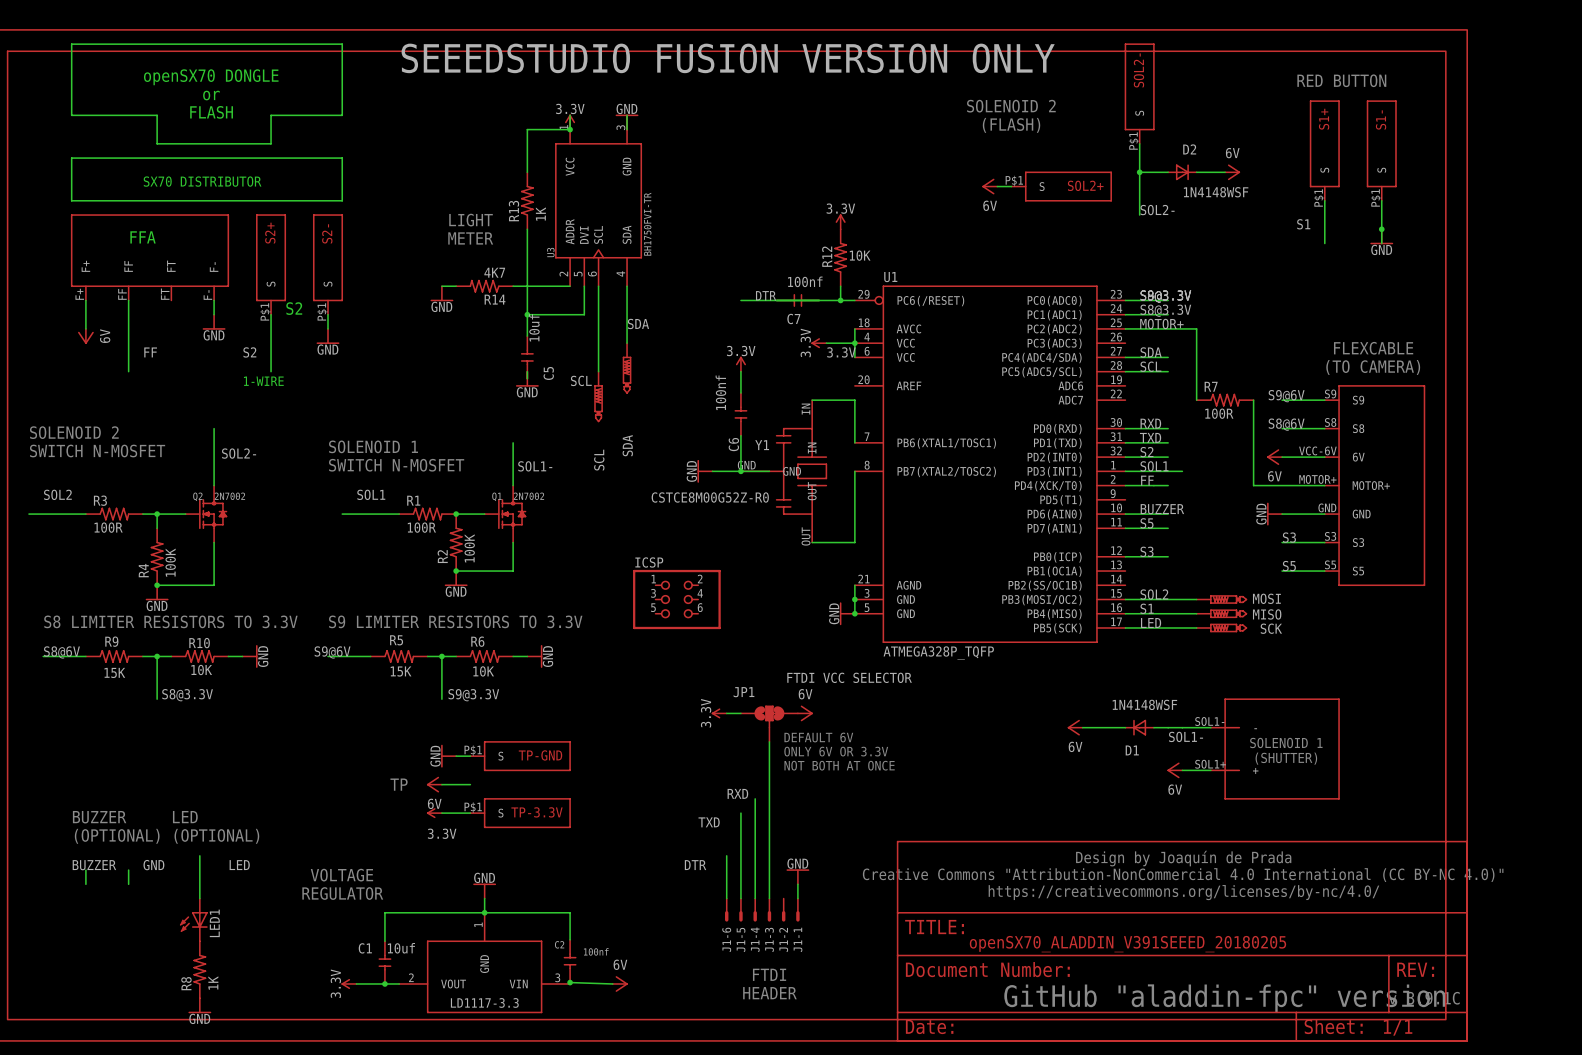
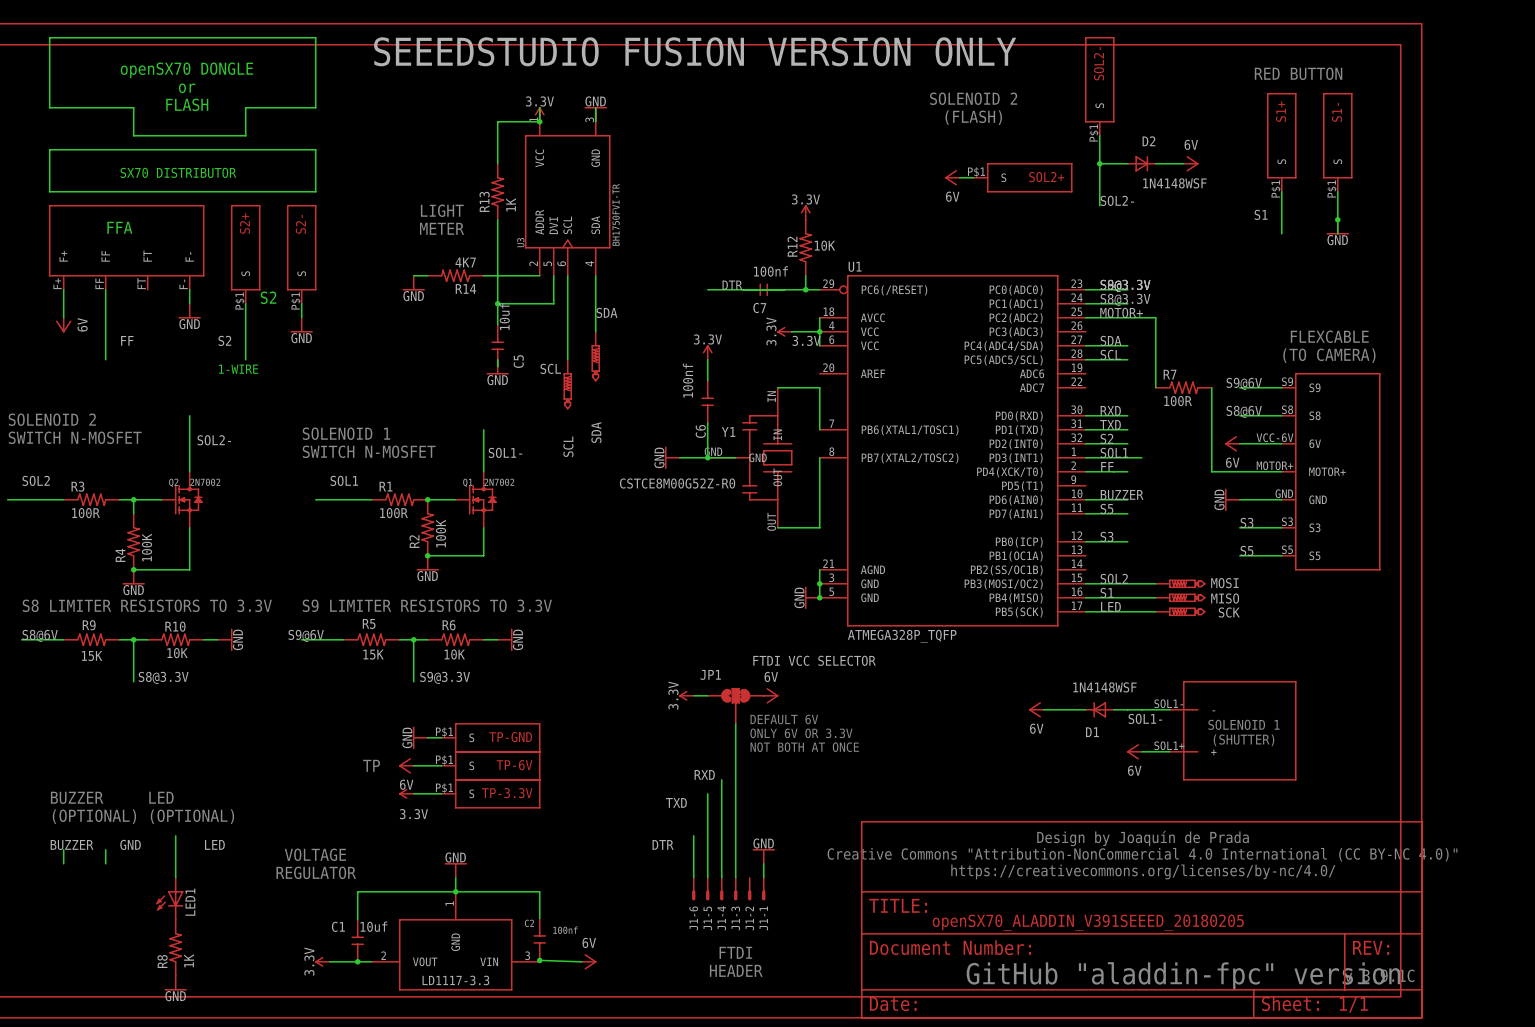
ICSP: (676, 599) -> none
TP-6V: none -> (490, 765)

